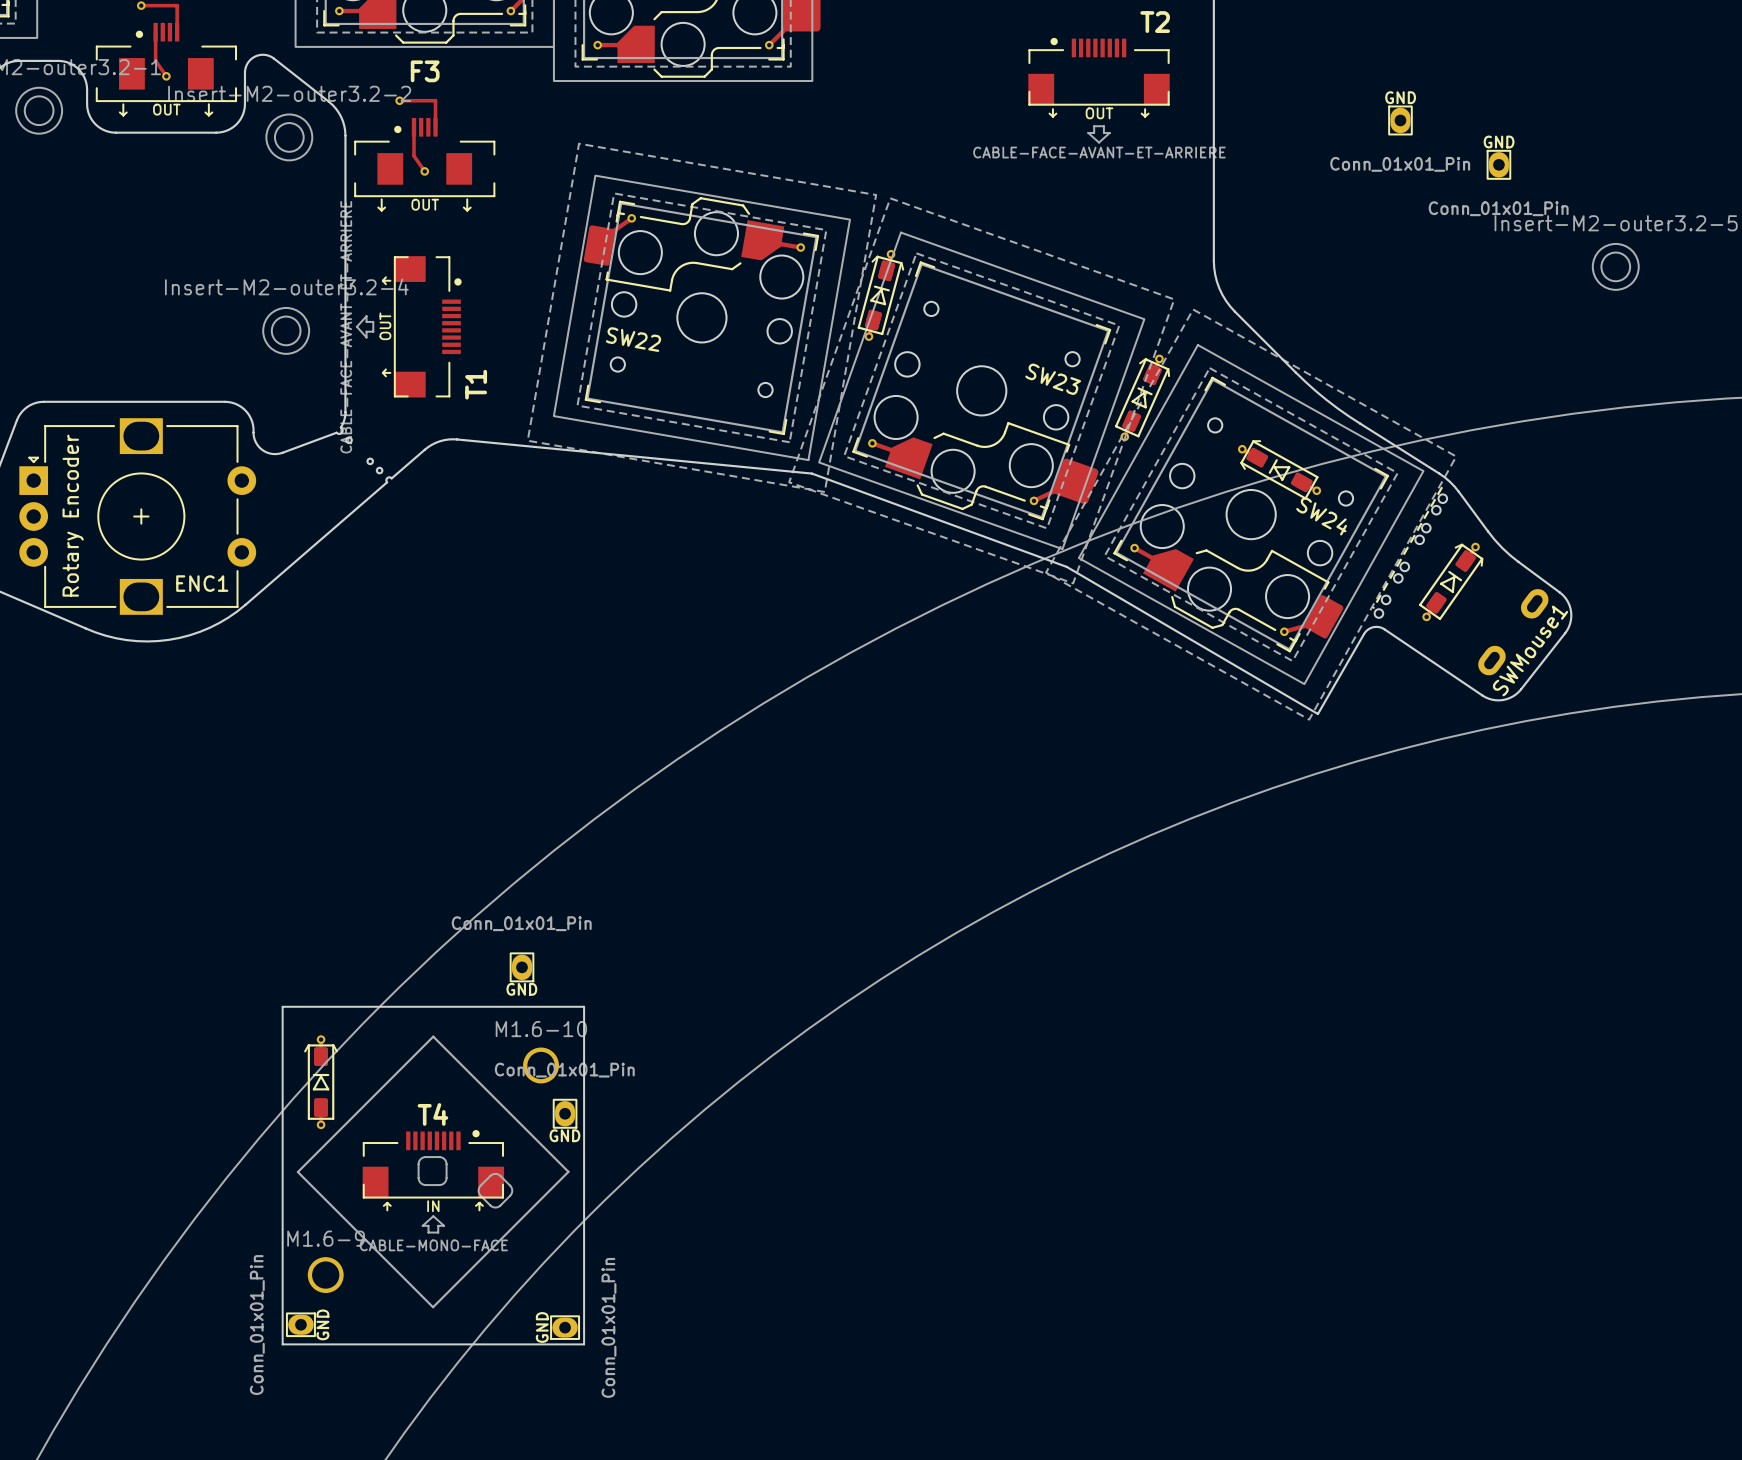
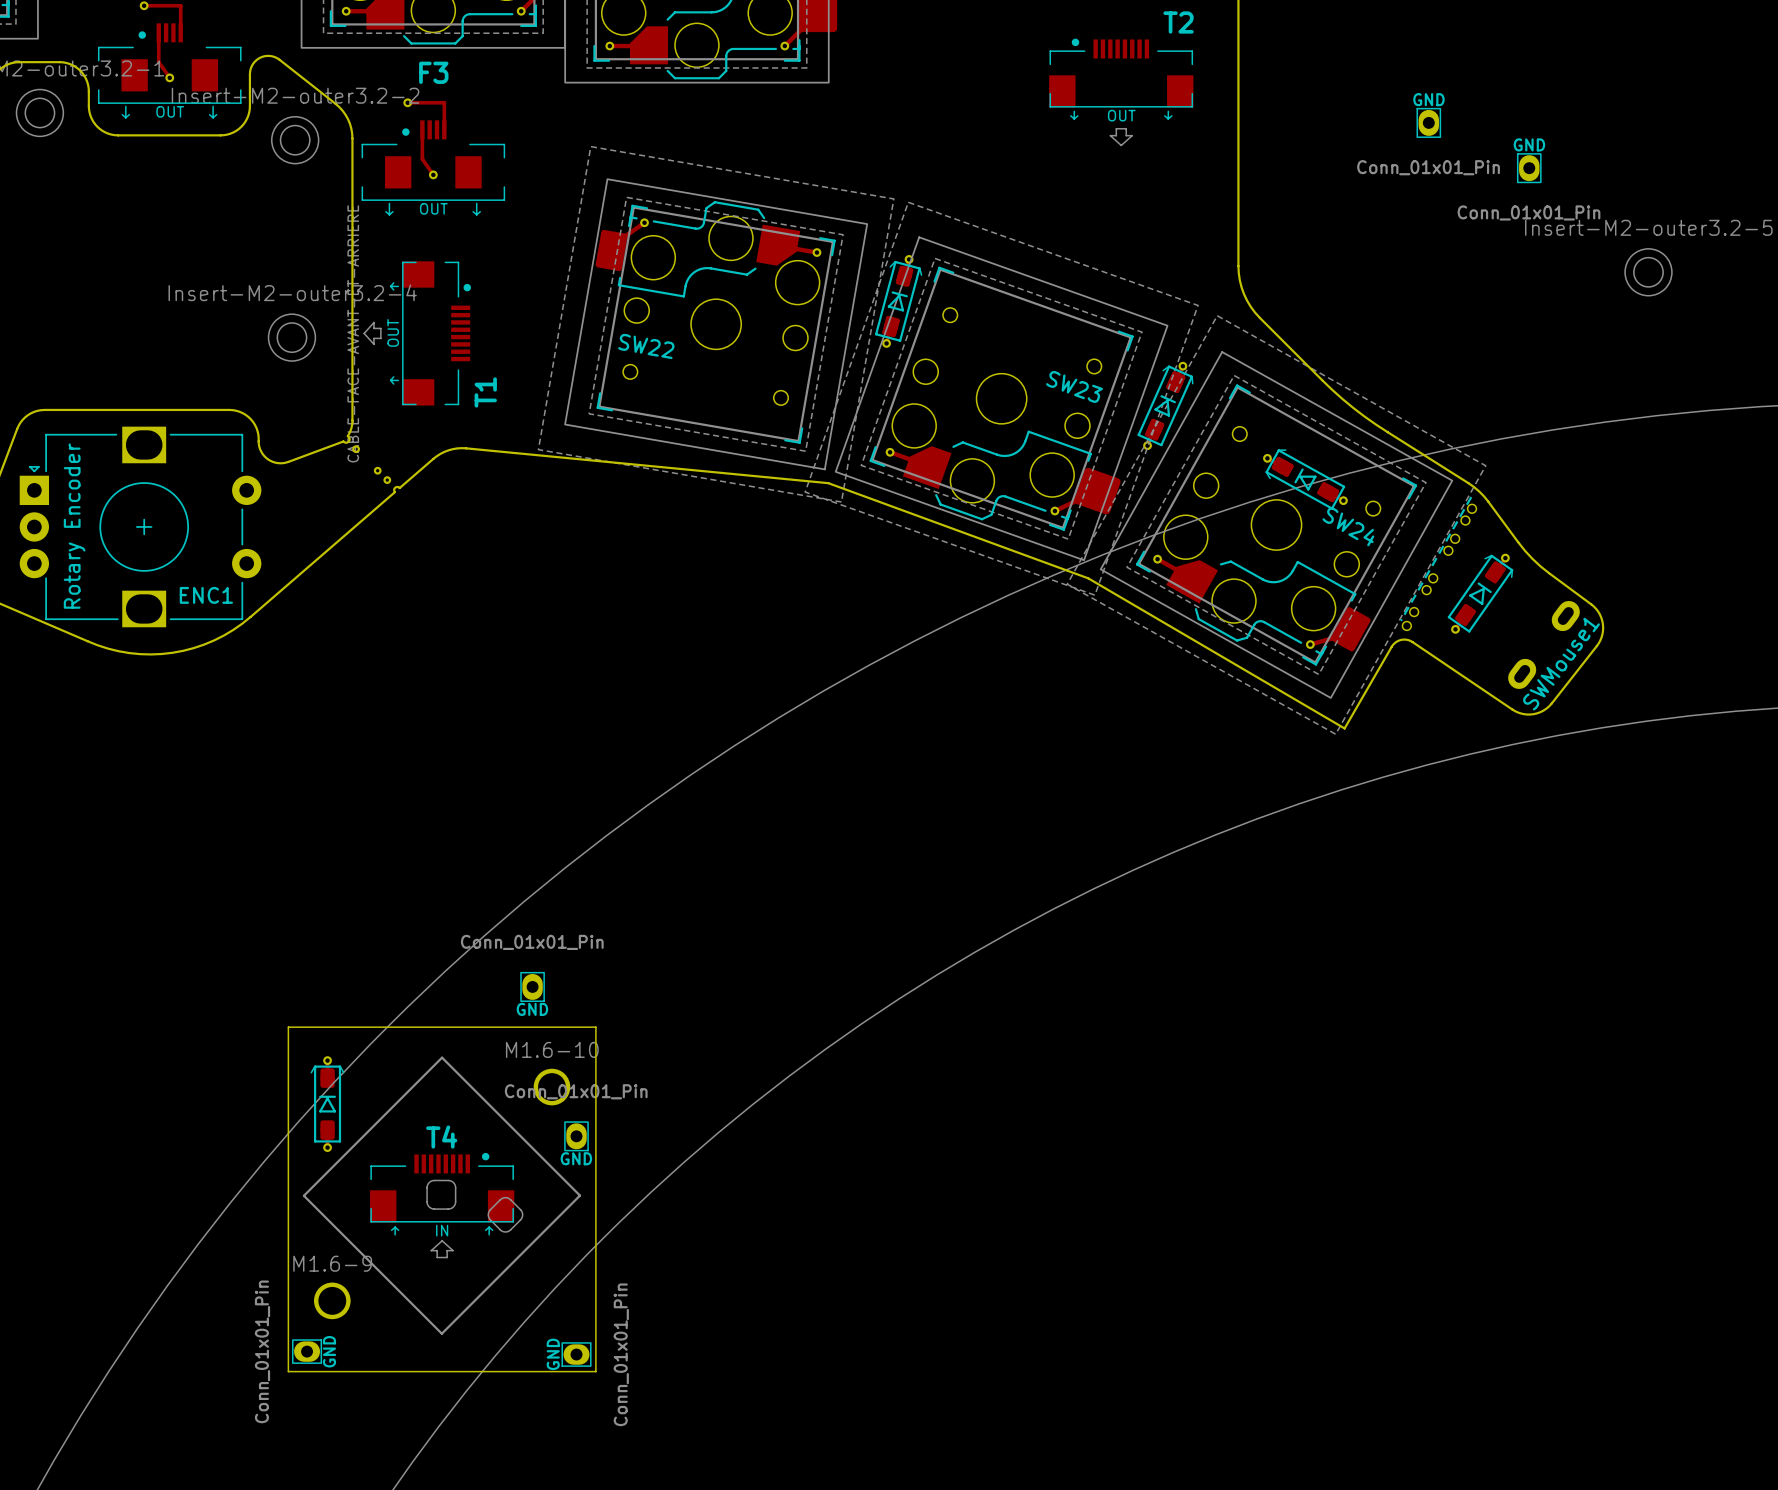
T2 text: CABLE-FACE-AVANT-ET-ARRIERE (1099, 152) -> none
T4 text: CABLE-MONO-FACE (433, 1245) -> none

